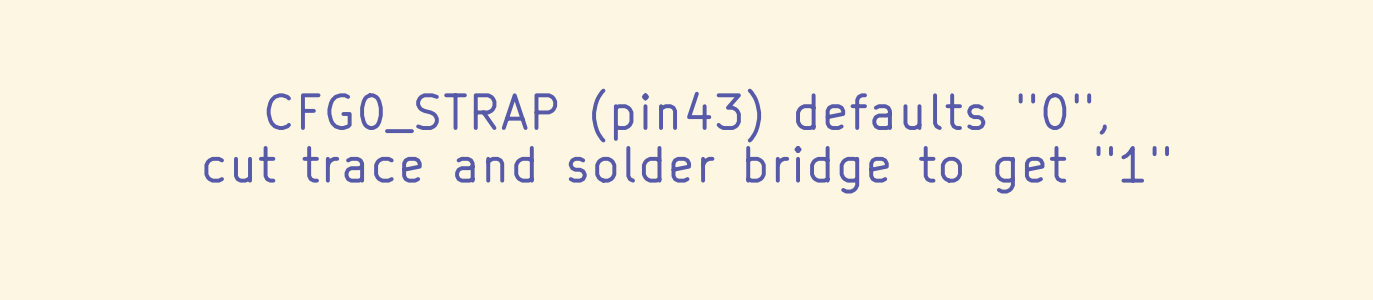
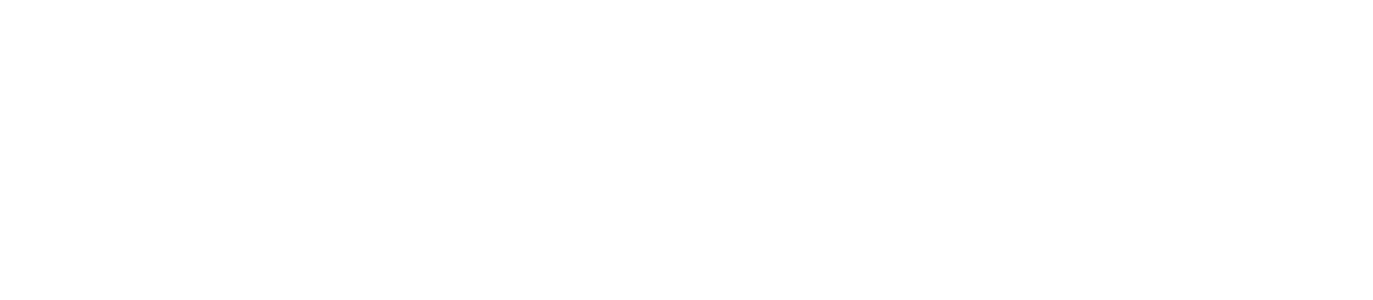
text: CFG0_STRAP (pin43) defaults "0", (686, 115) -> none
text: cut trace and solder bridge to get "1" (686, 169) -> none

